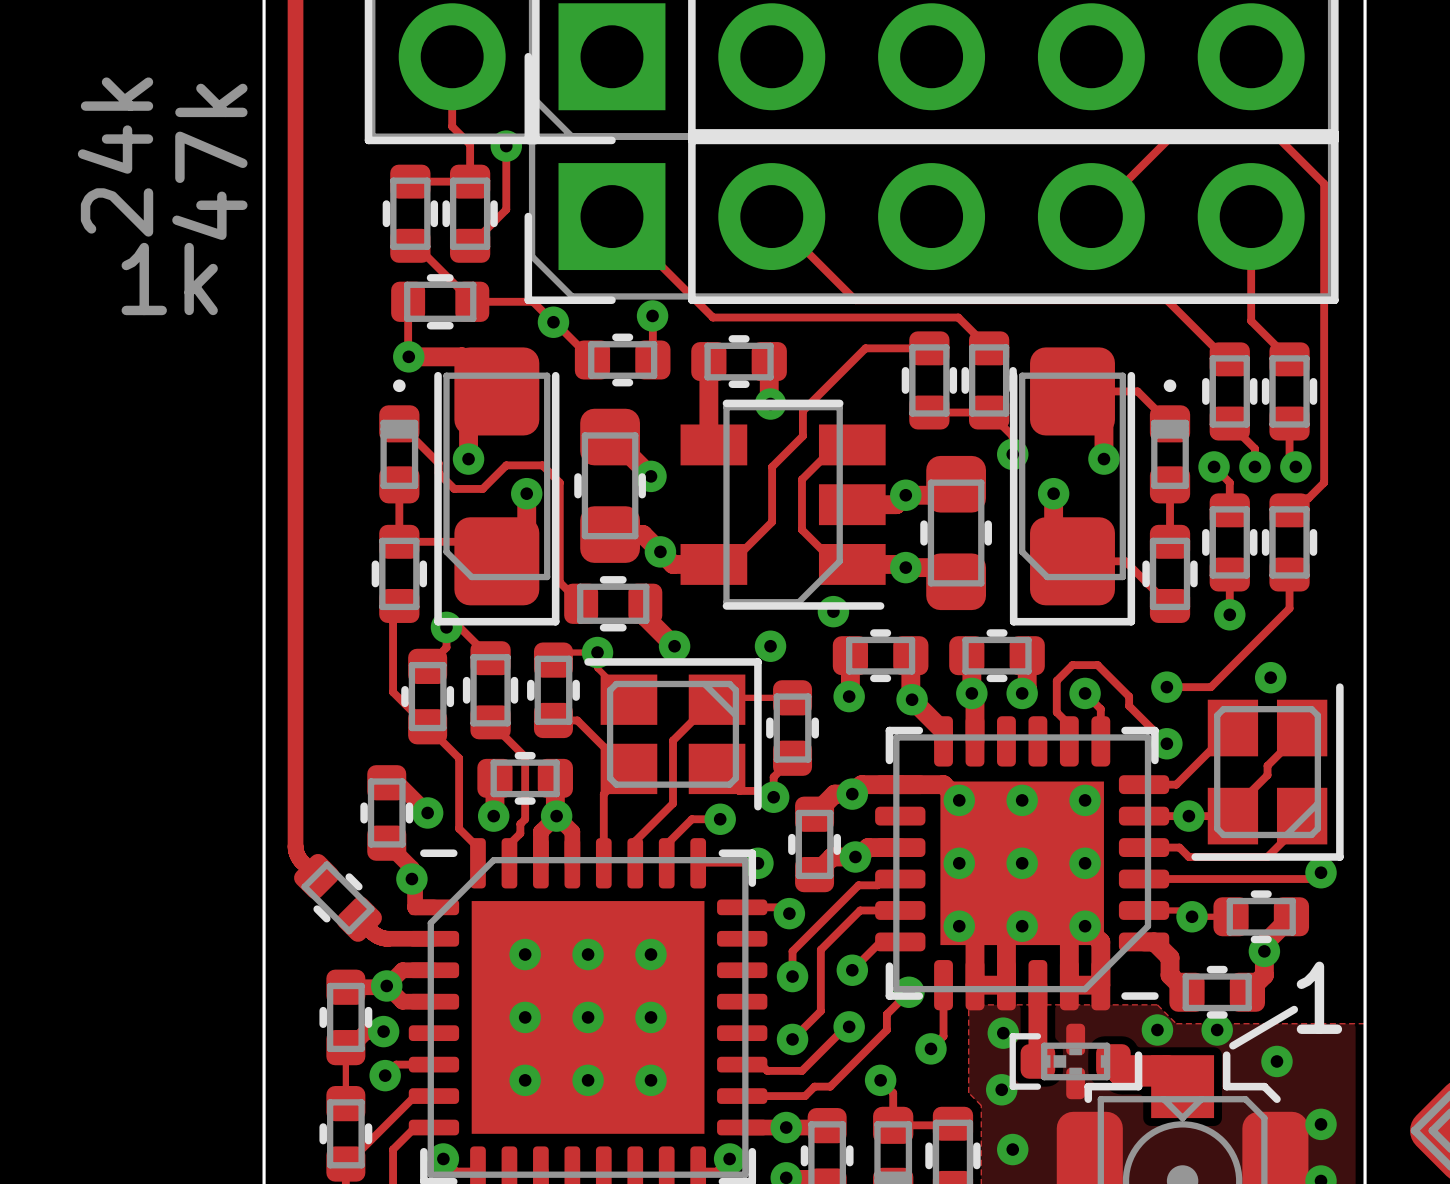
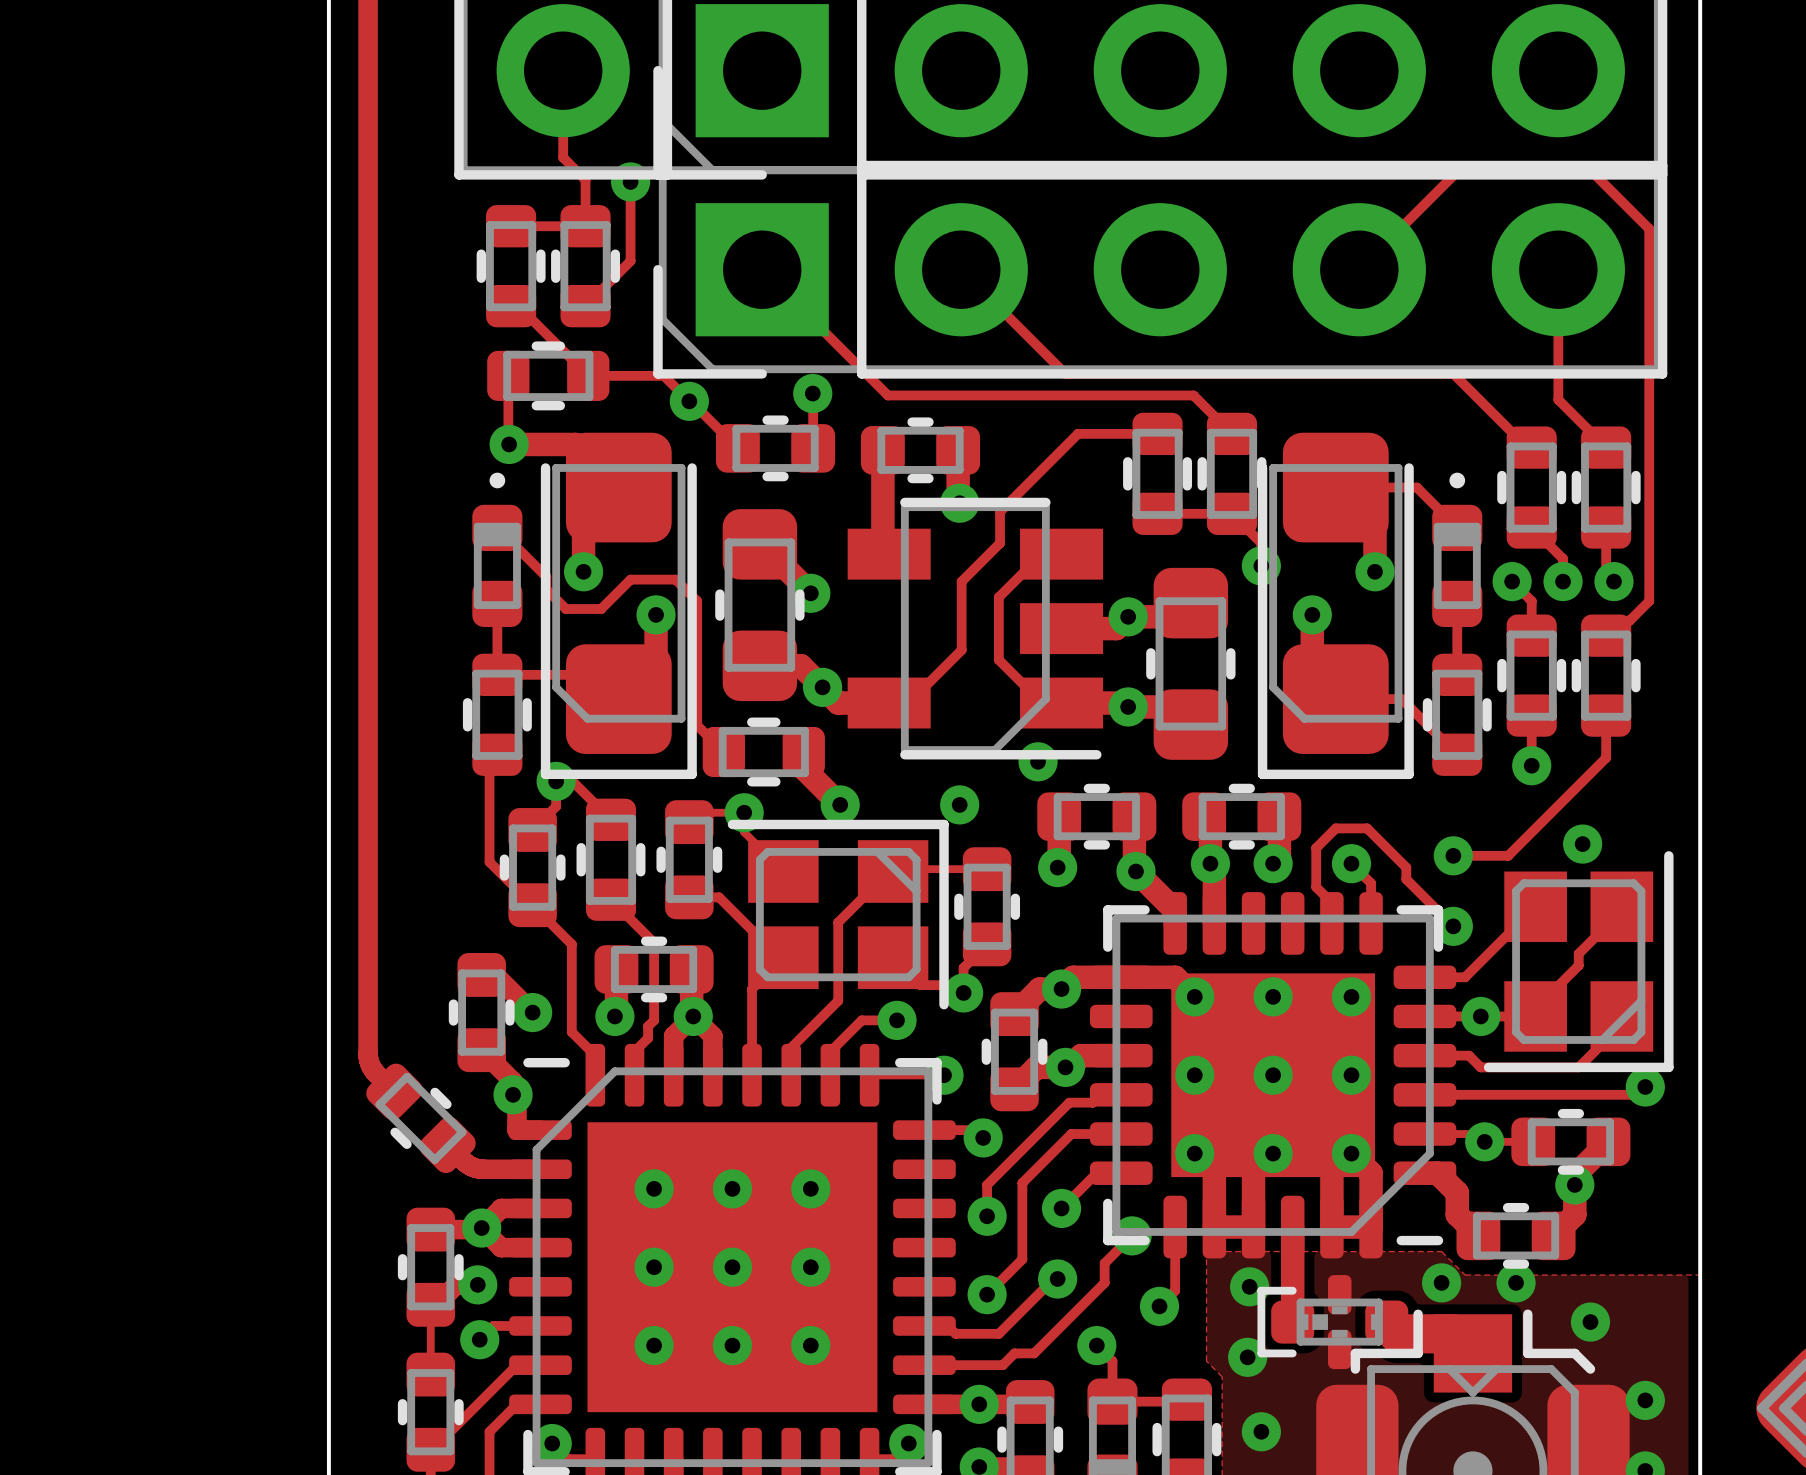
part value: 24k (115, 157) -> none
part value: 47k (209, 161) -> none
part value: 1k (169, 278) -> none
text: 1 (1319, 997) -> none
line: (1294, 1009) (1232, 1045) -> none

